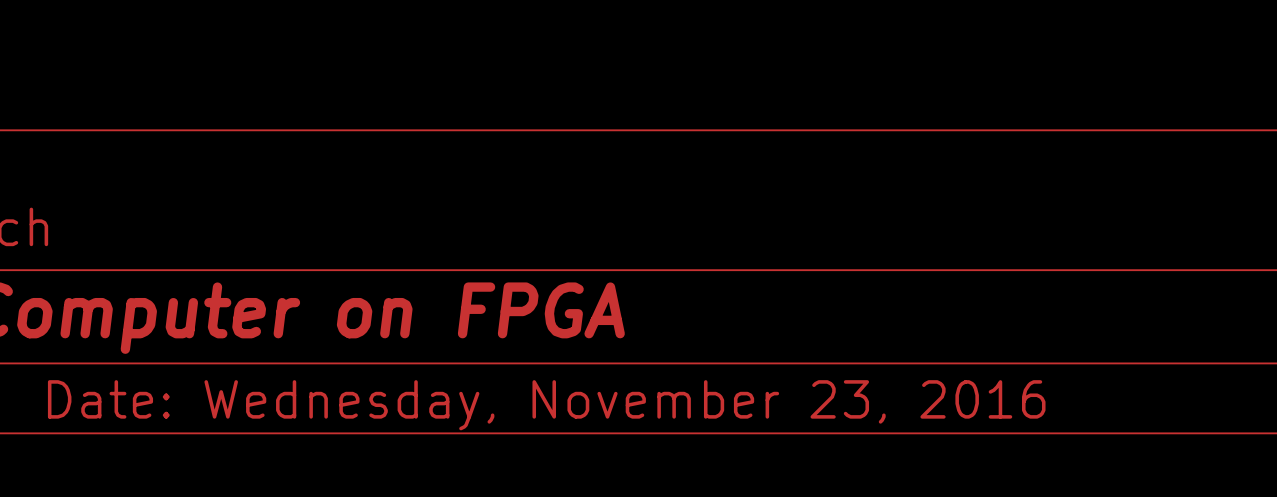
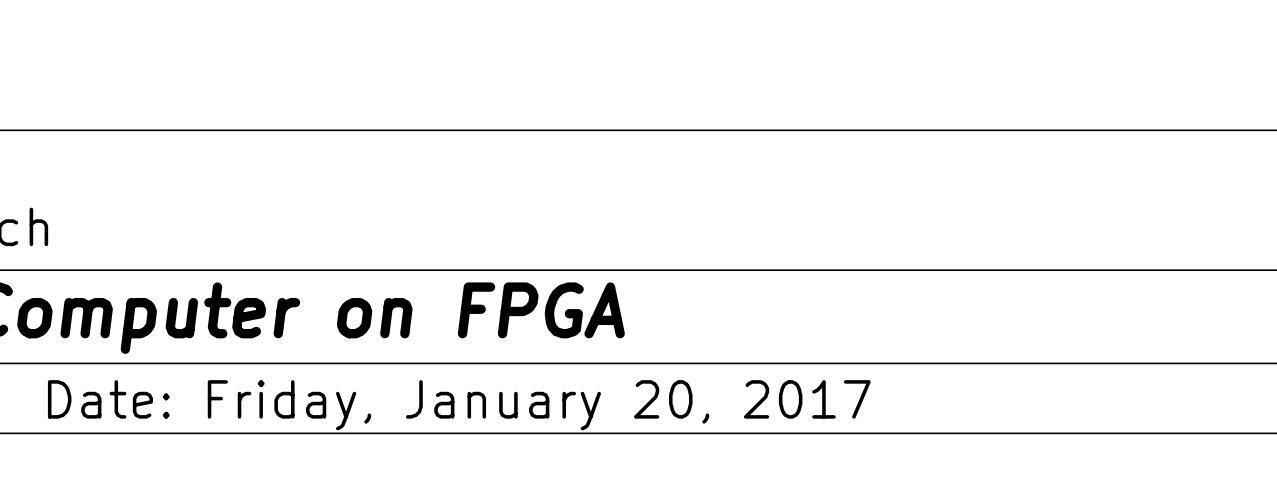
title block: Date: Wednesday, November 23, 2016 (546, 405) -> Date: Friday, January 20, 2017 (459, 405)

